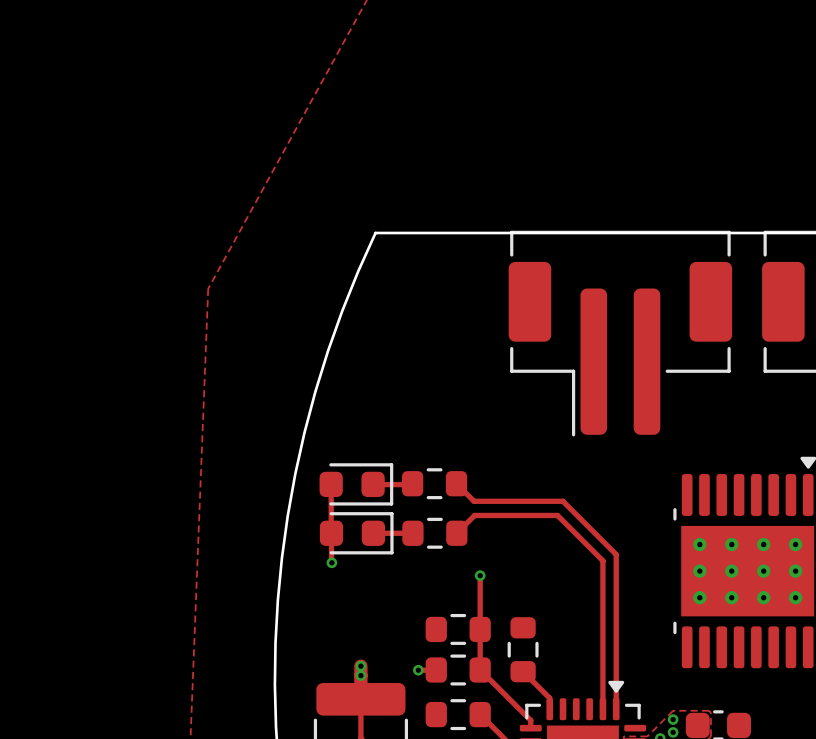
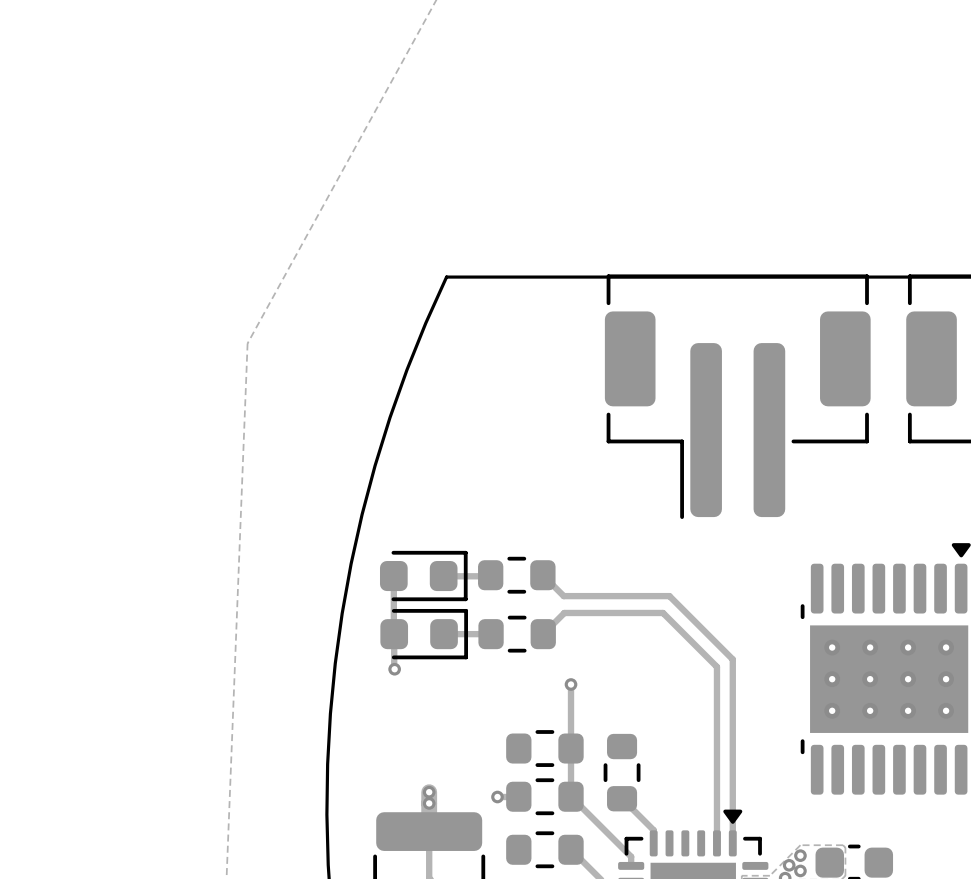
via: none -> (789, 865)

